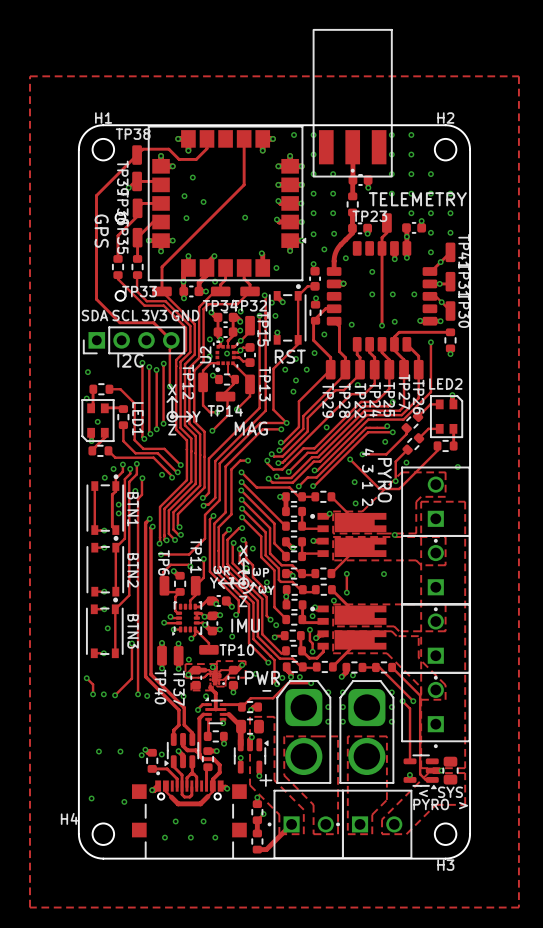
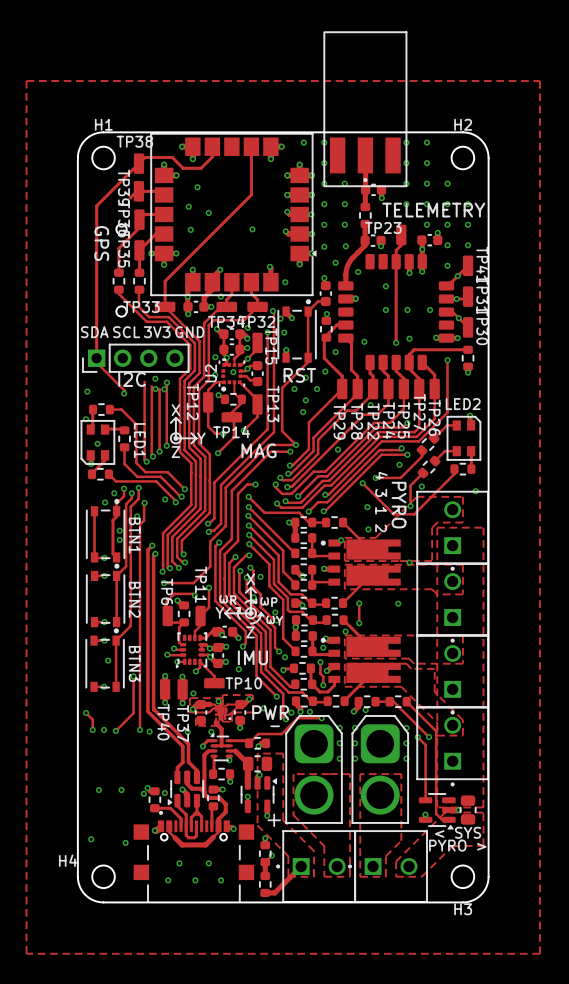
via: (128, 187) -> none
track: (96, 195) (96, 299) (119, 322) (153, 322) (171, 340) (169, 386) -> (96, 205) (96, 358)
track: none -> (98, 362) (124, 390) (124, 393)
via: none -> (155, 378)
via: (142, 362) -> none
via: (149, 367) -> none
via: none -> (155, 389)
via: (156, 369) -> none
via: none -> (164, 389)
via: none -> (124, 393)
via: (169, 386) -> none

